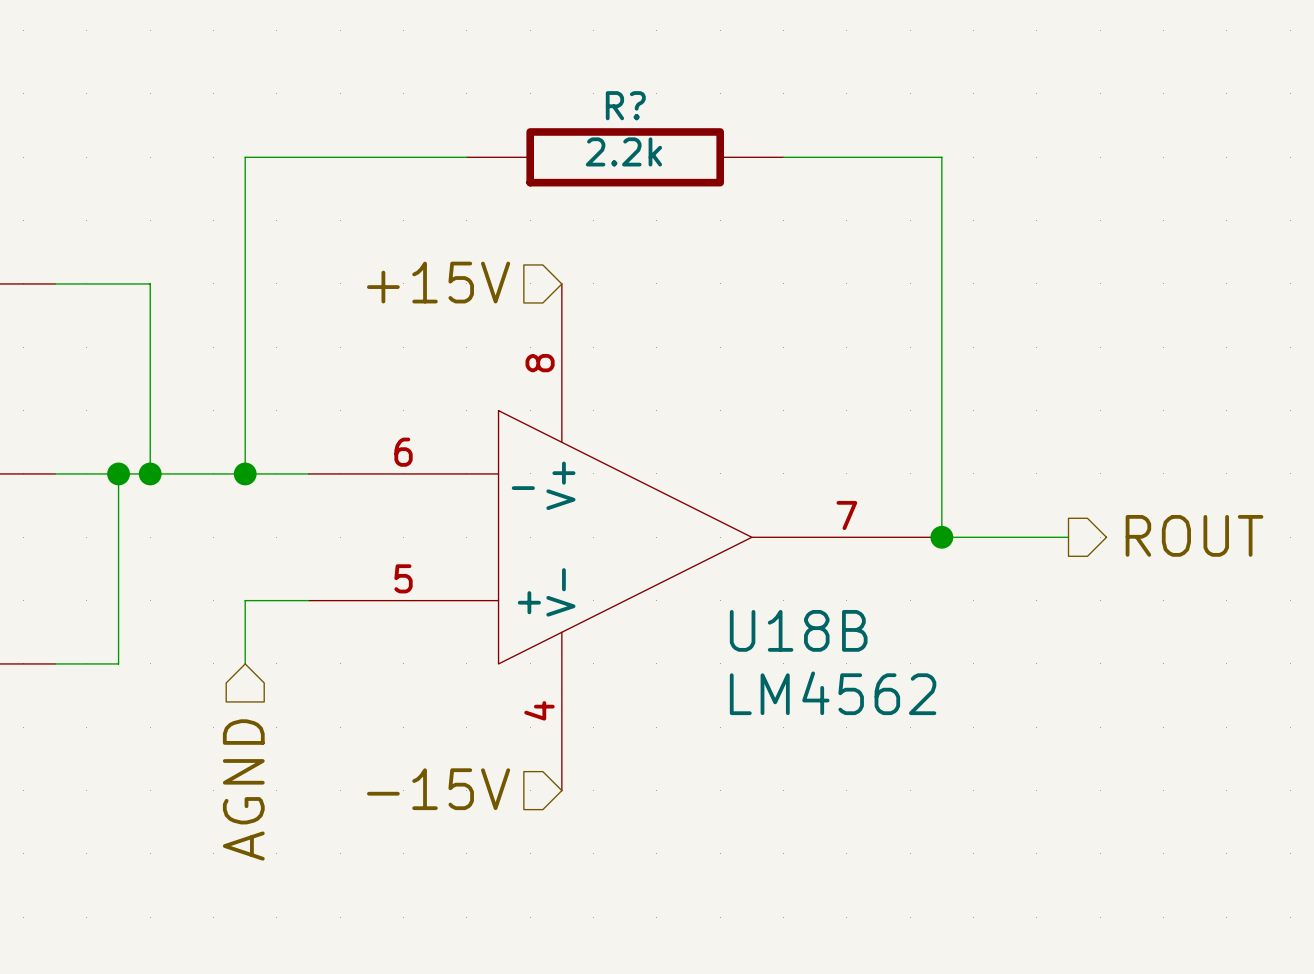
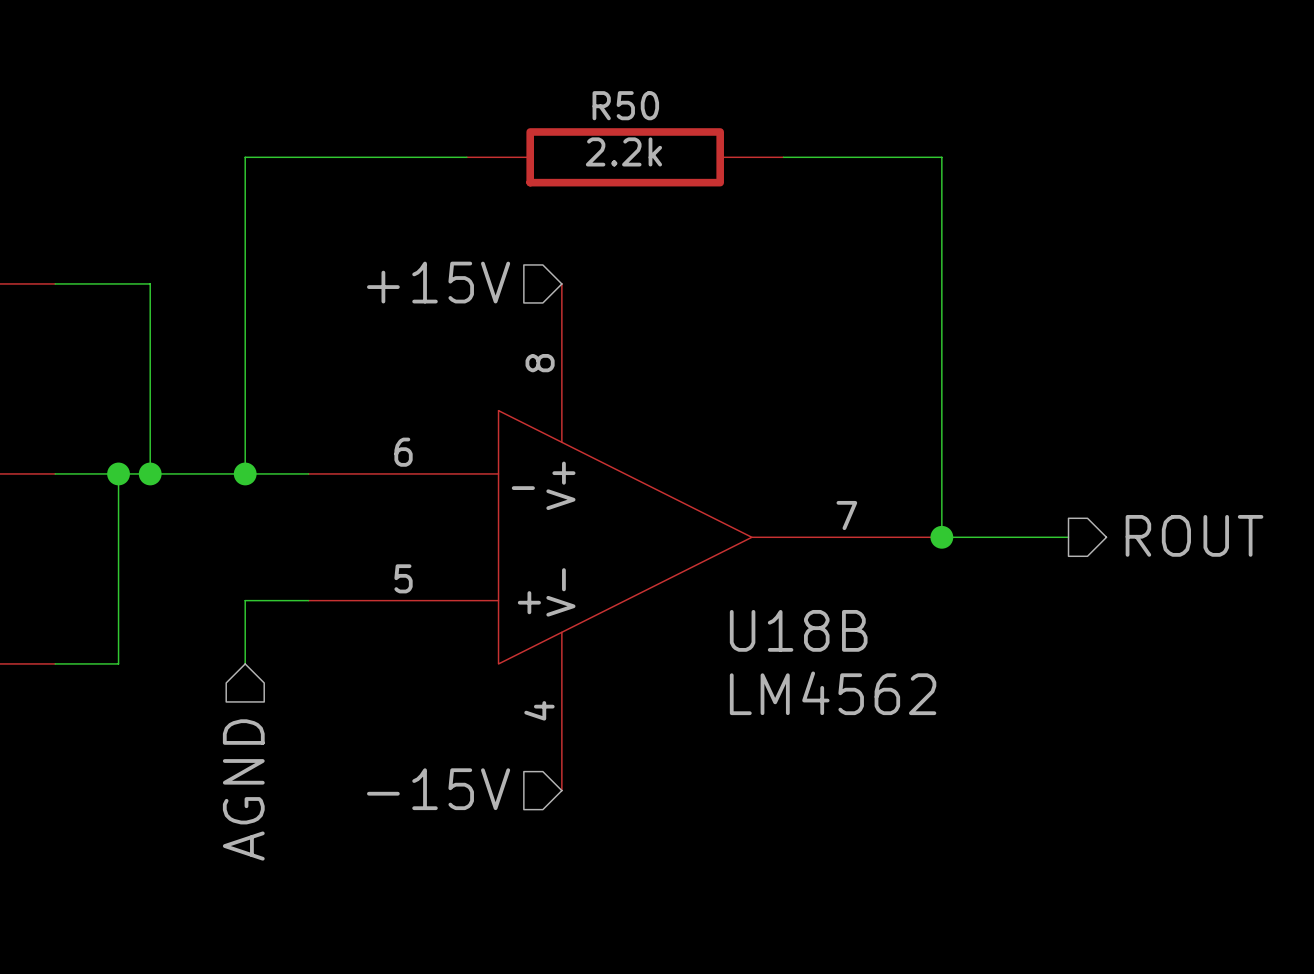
R? name: R? (625, 105) -> R50 (625, 105)

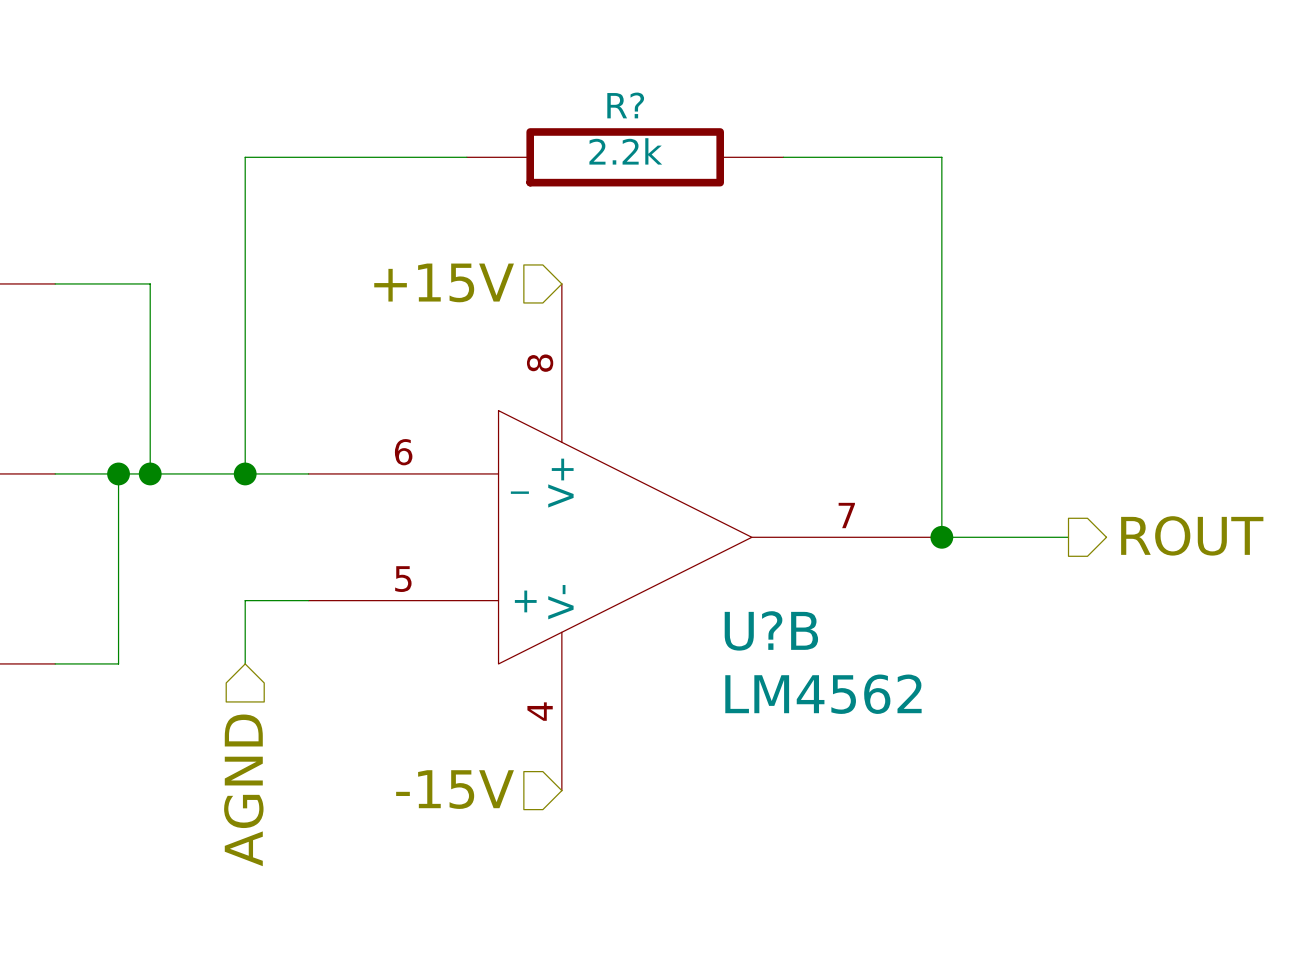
R50 name: R50 (625, 105) -> R? (625, 105)
U18B name: U18B (798, 630) -> U?B (771, 630)

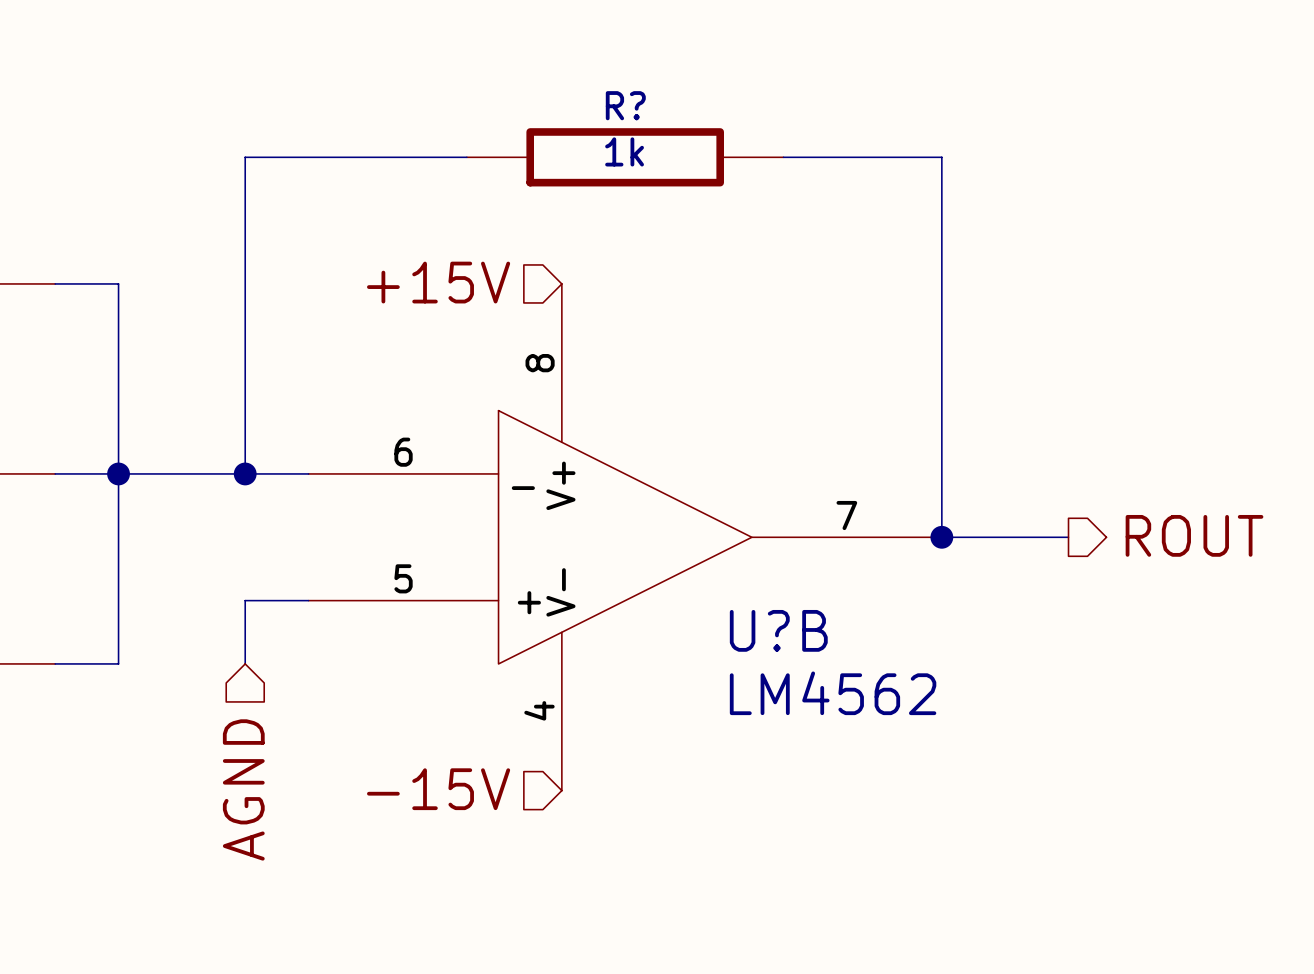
R? value: 2.2k (625, 151) -> 1k (624, 151)
wire: (118, 283) (150, 283) (150, 473) -> (118, 283) (118, 473)
junction: (150, 473) -> none

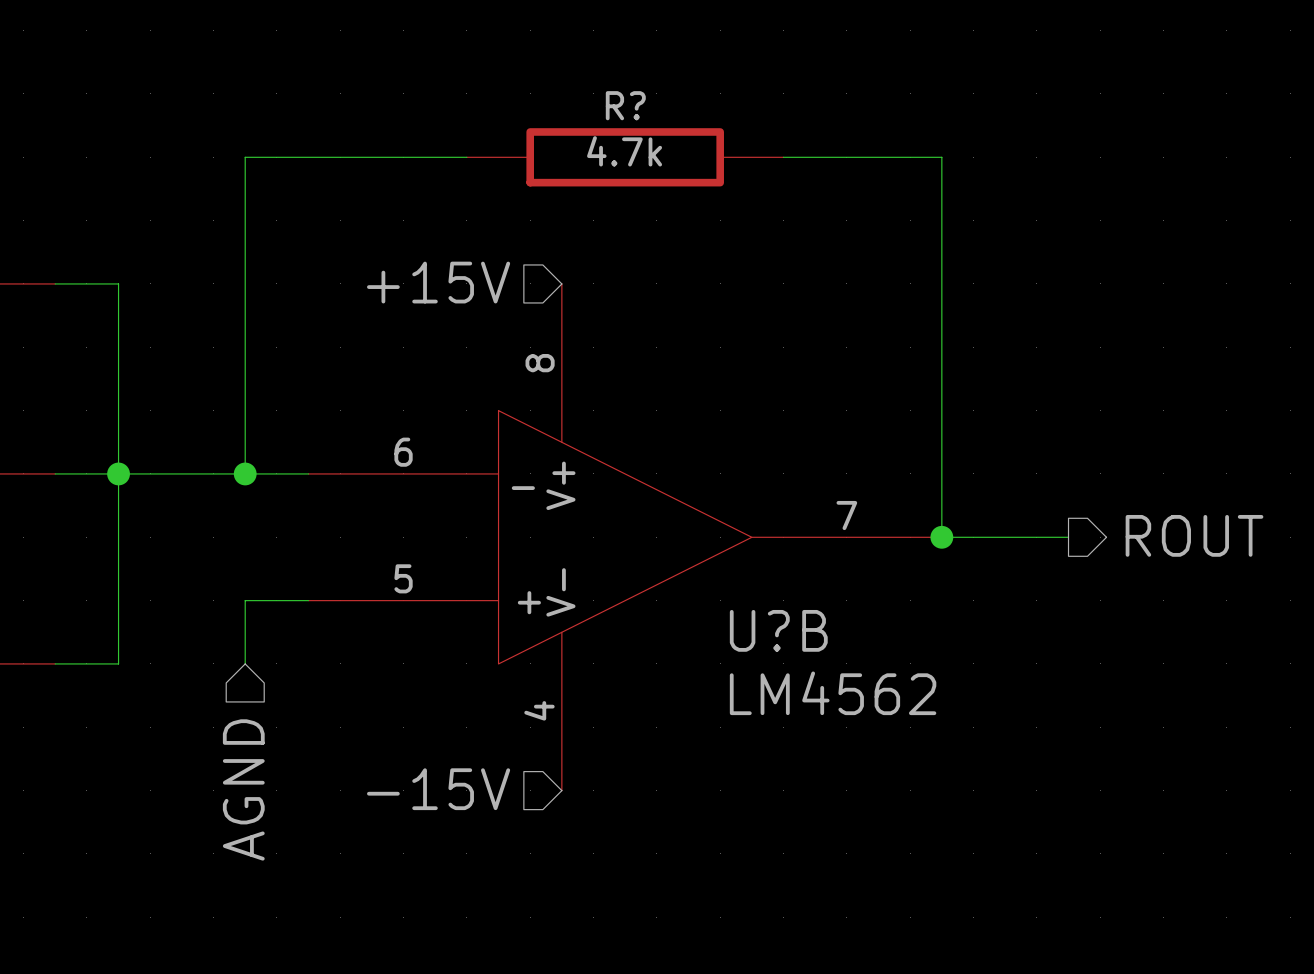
R? value: 1k (624, 151) -> 4.7k (624, 151)

